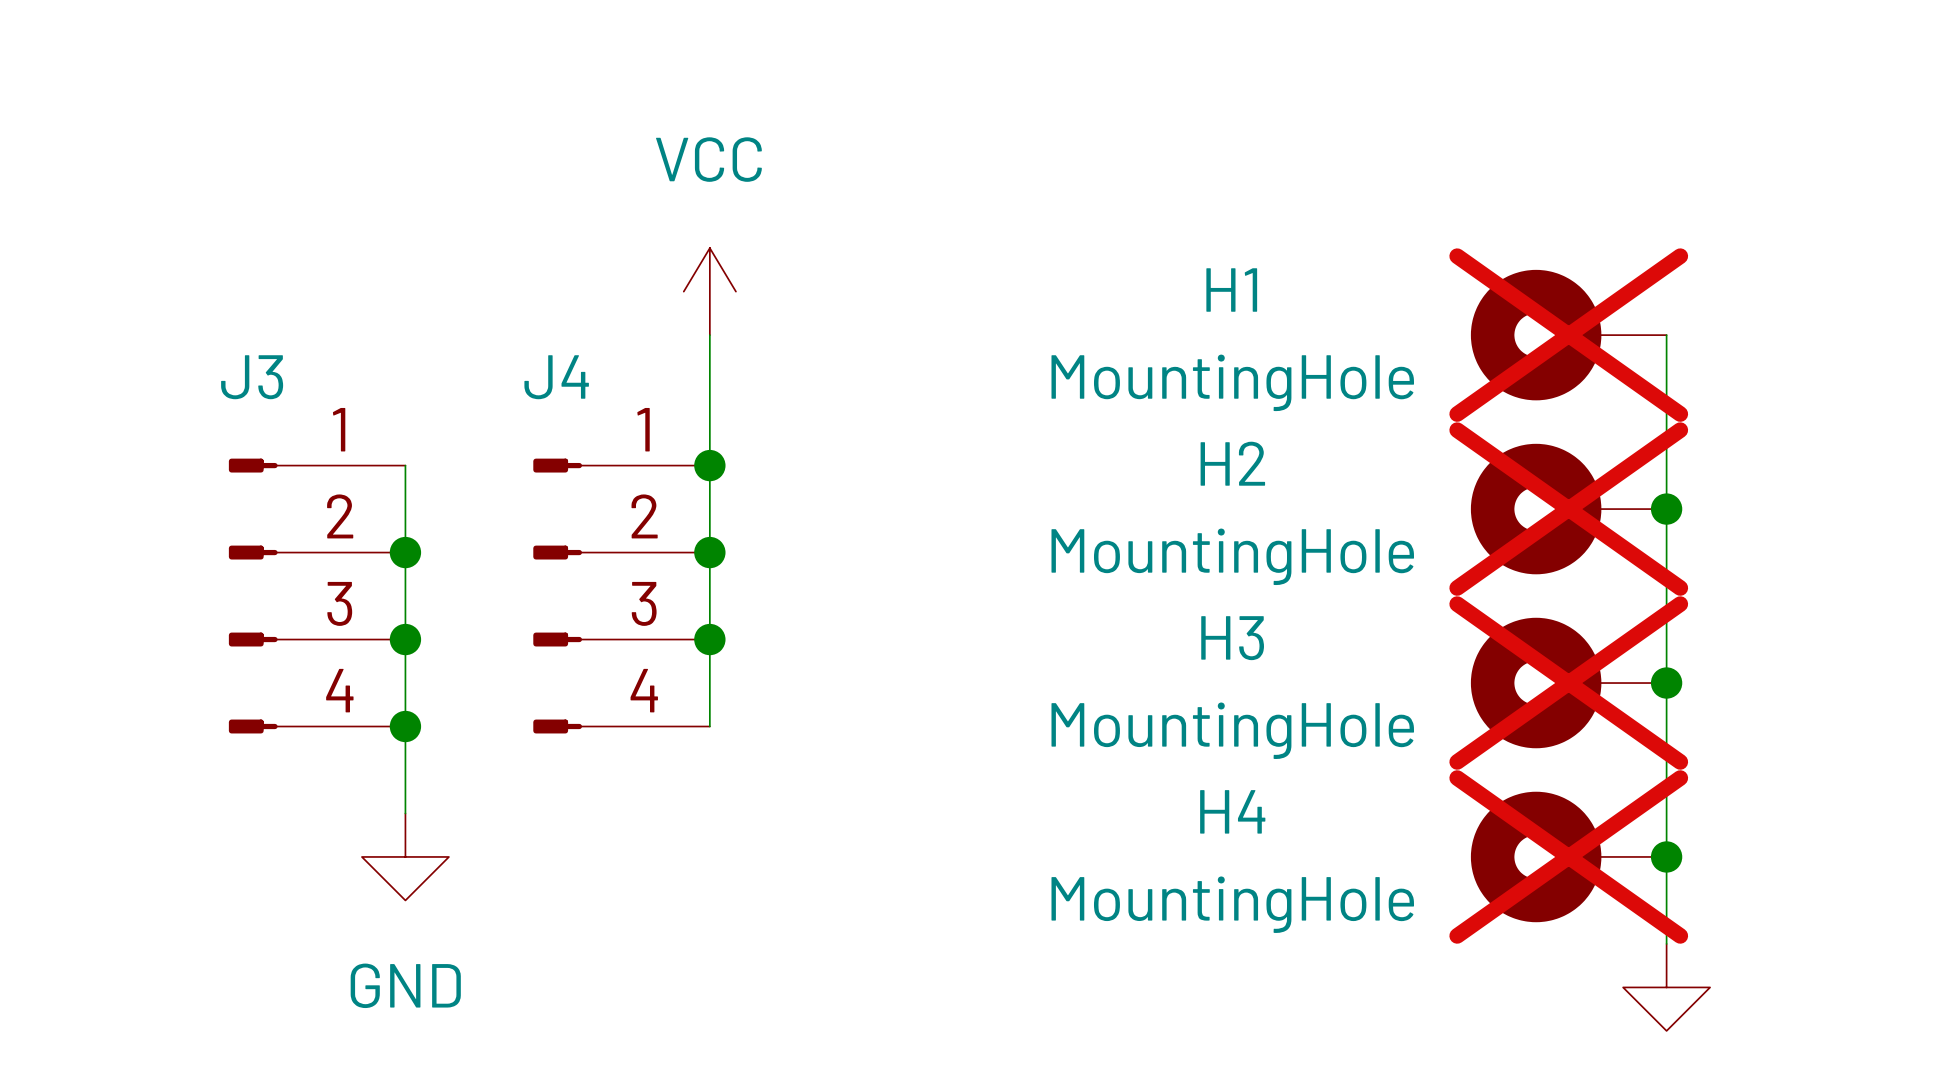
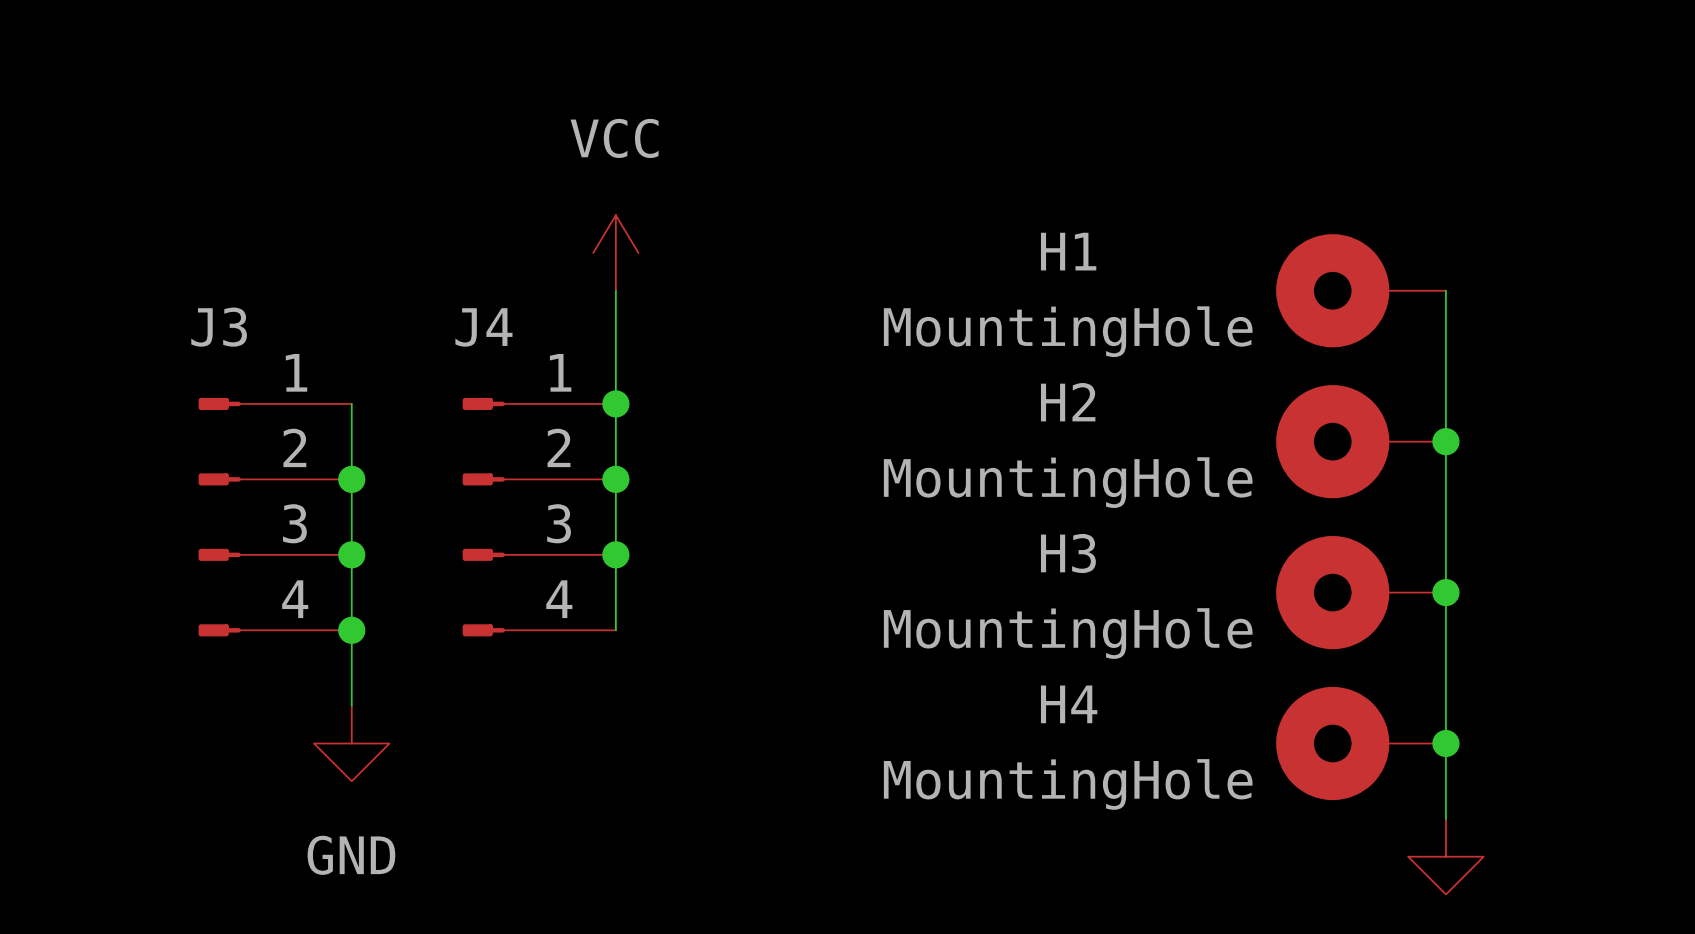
H1 do-not-place cross: (1568, 335) -> none
H2 do-not-place cross: (1568, 509) -> none
H3 do-not-place cross: (1568, 683) -> none
H4 do-not-place cross: (1568, 856) -> none

